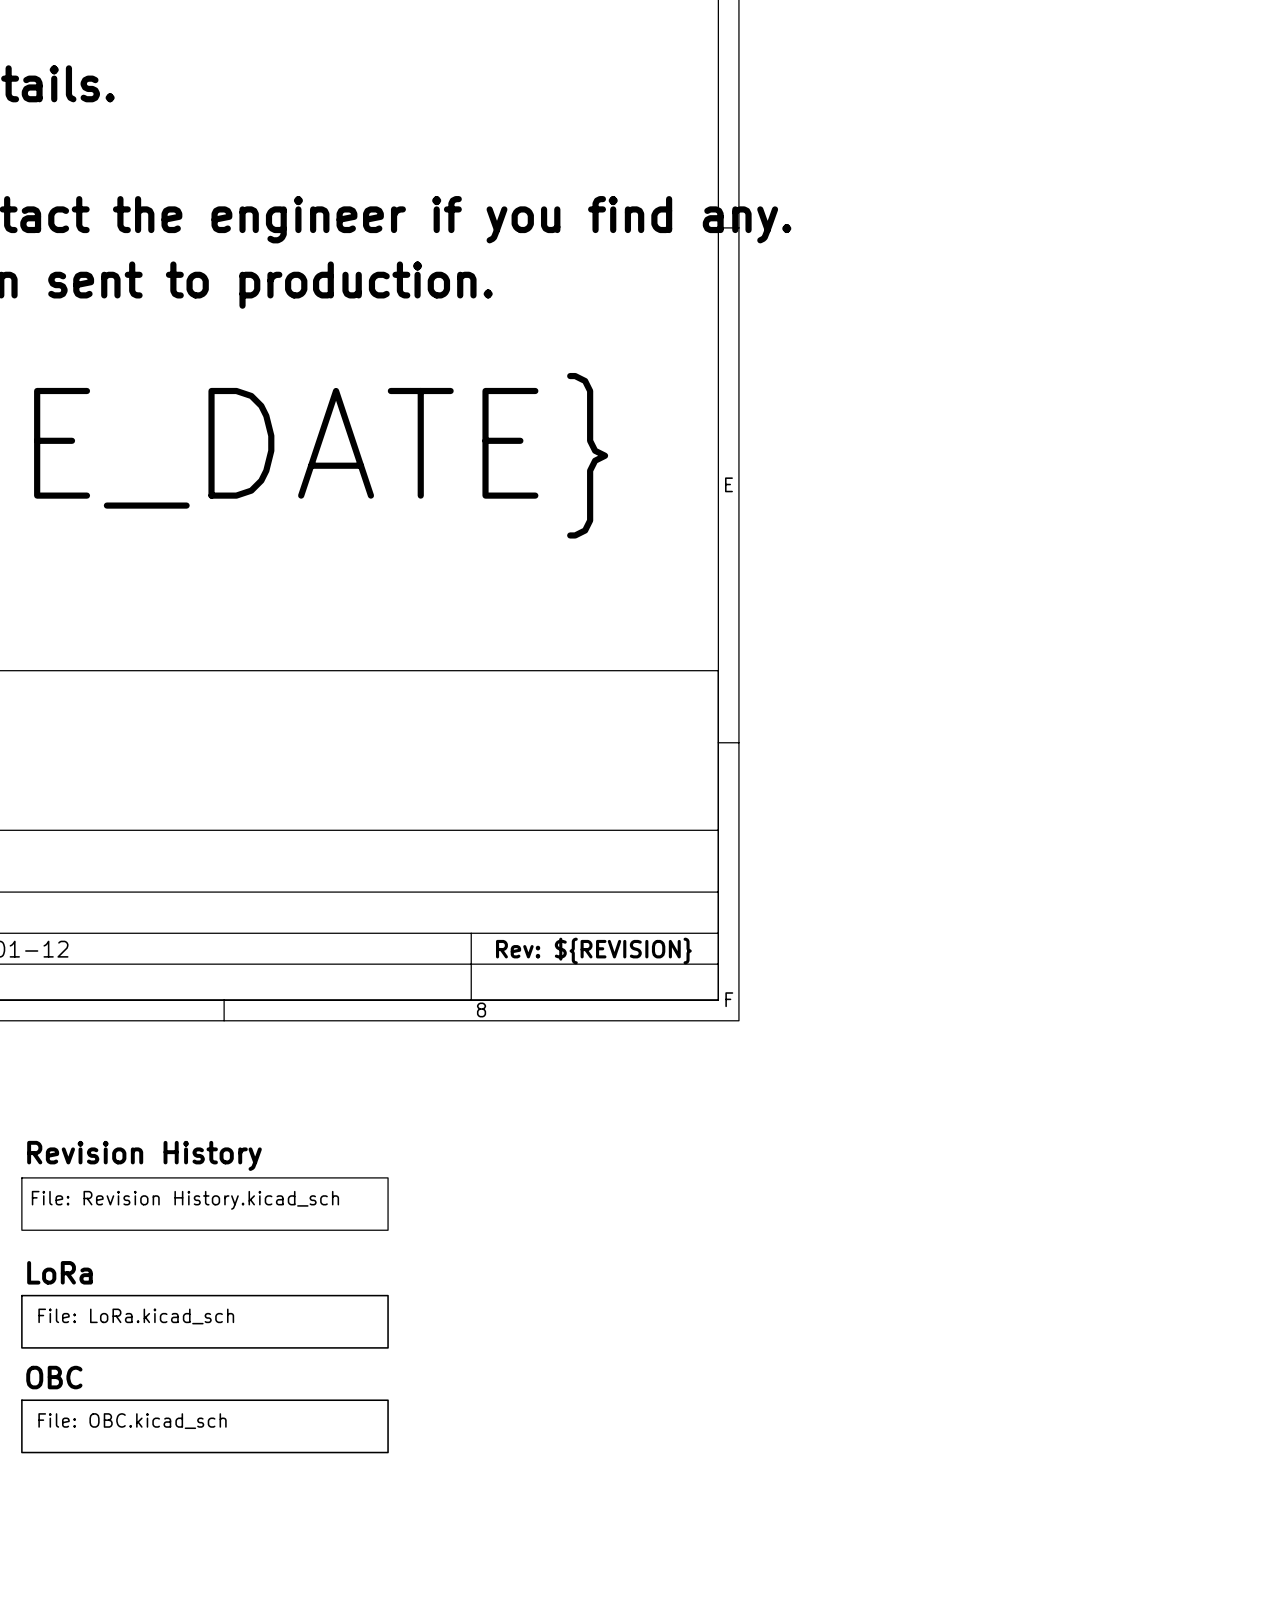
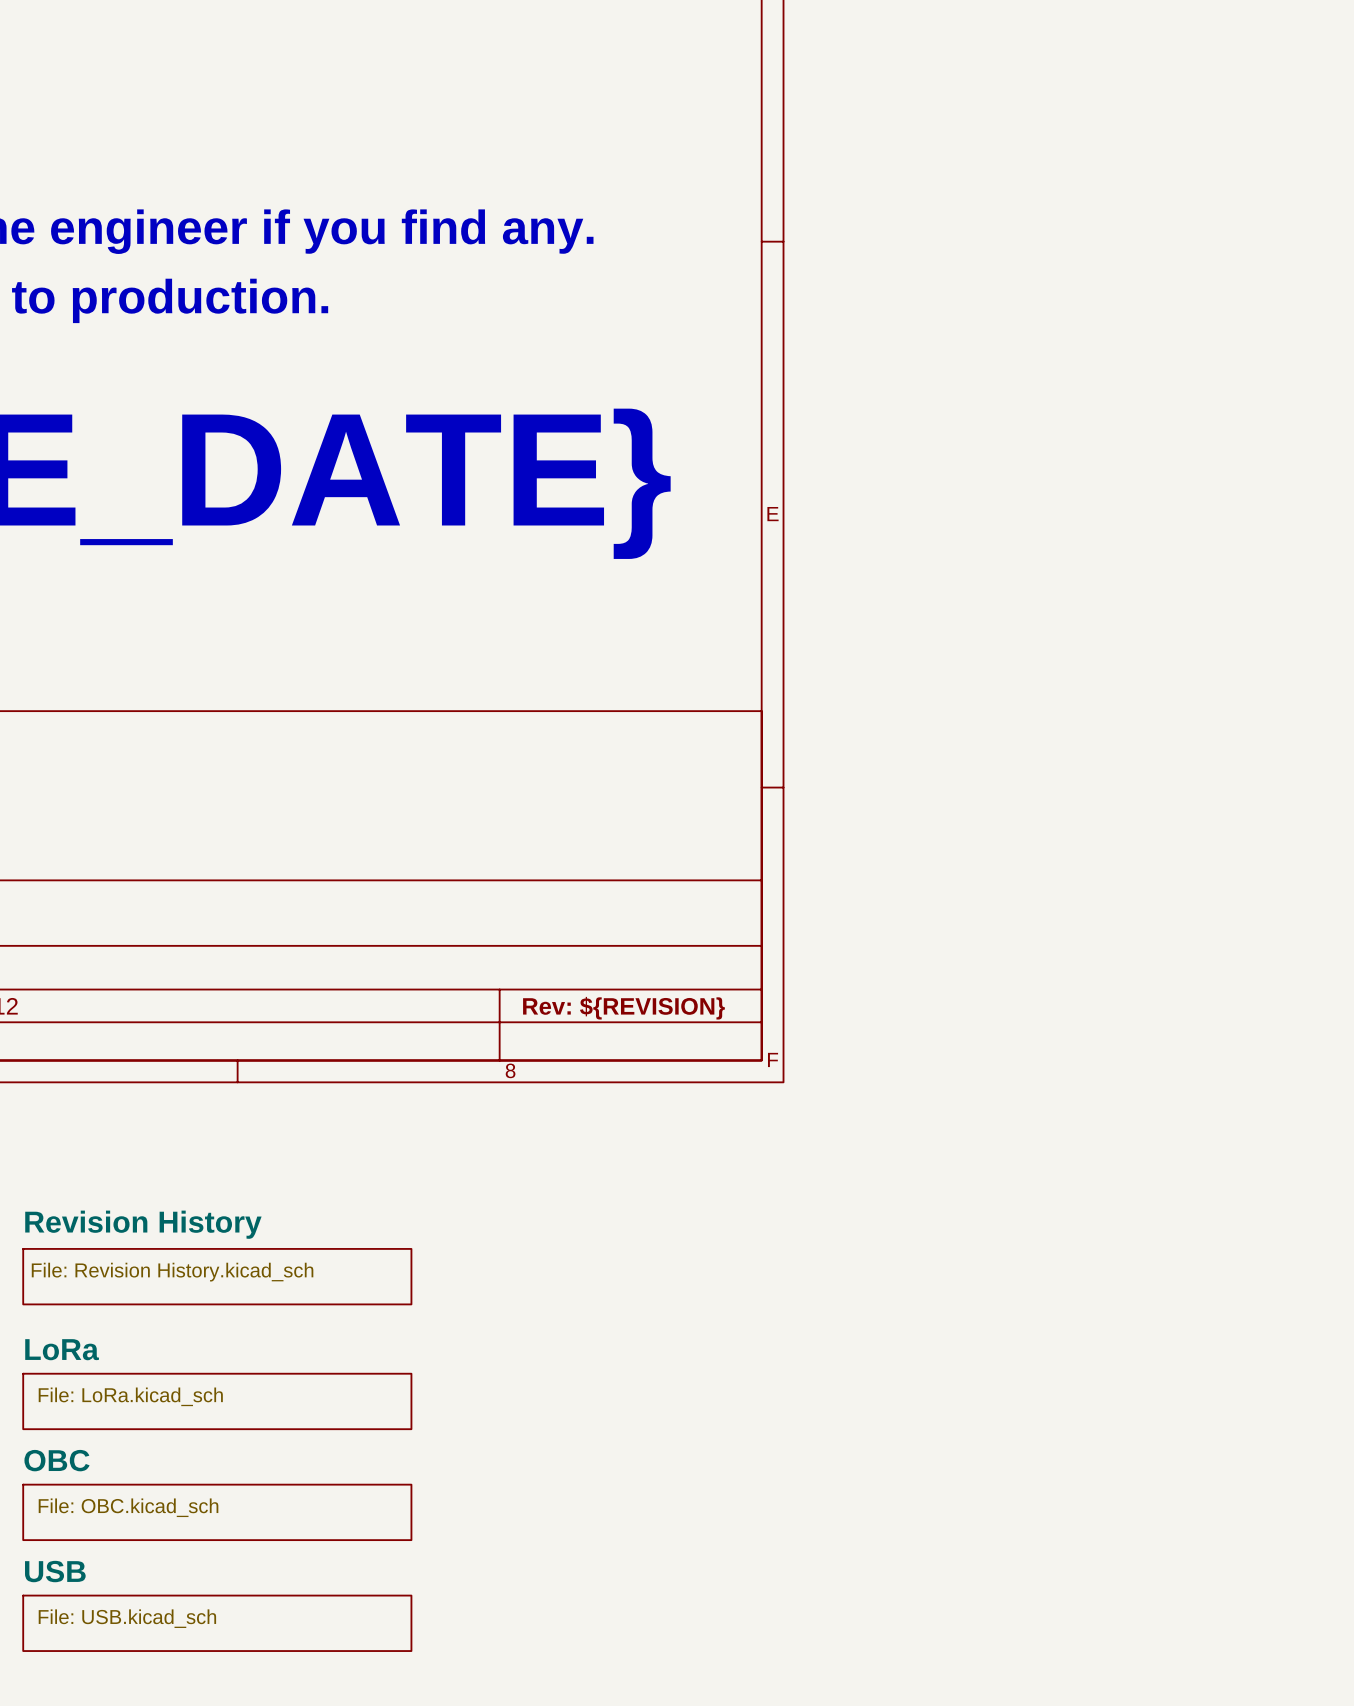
sheet USB: none -> File: USB.kicad_sch (217, 1623)

